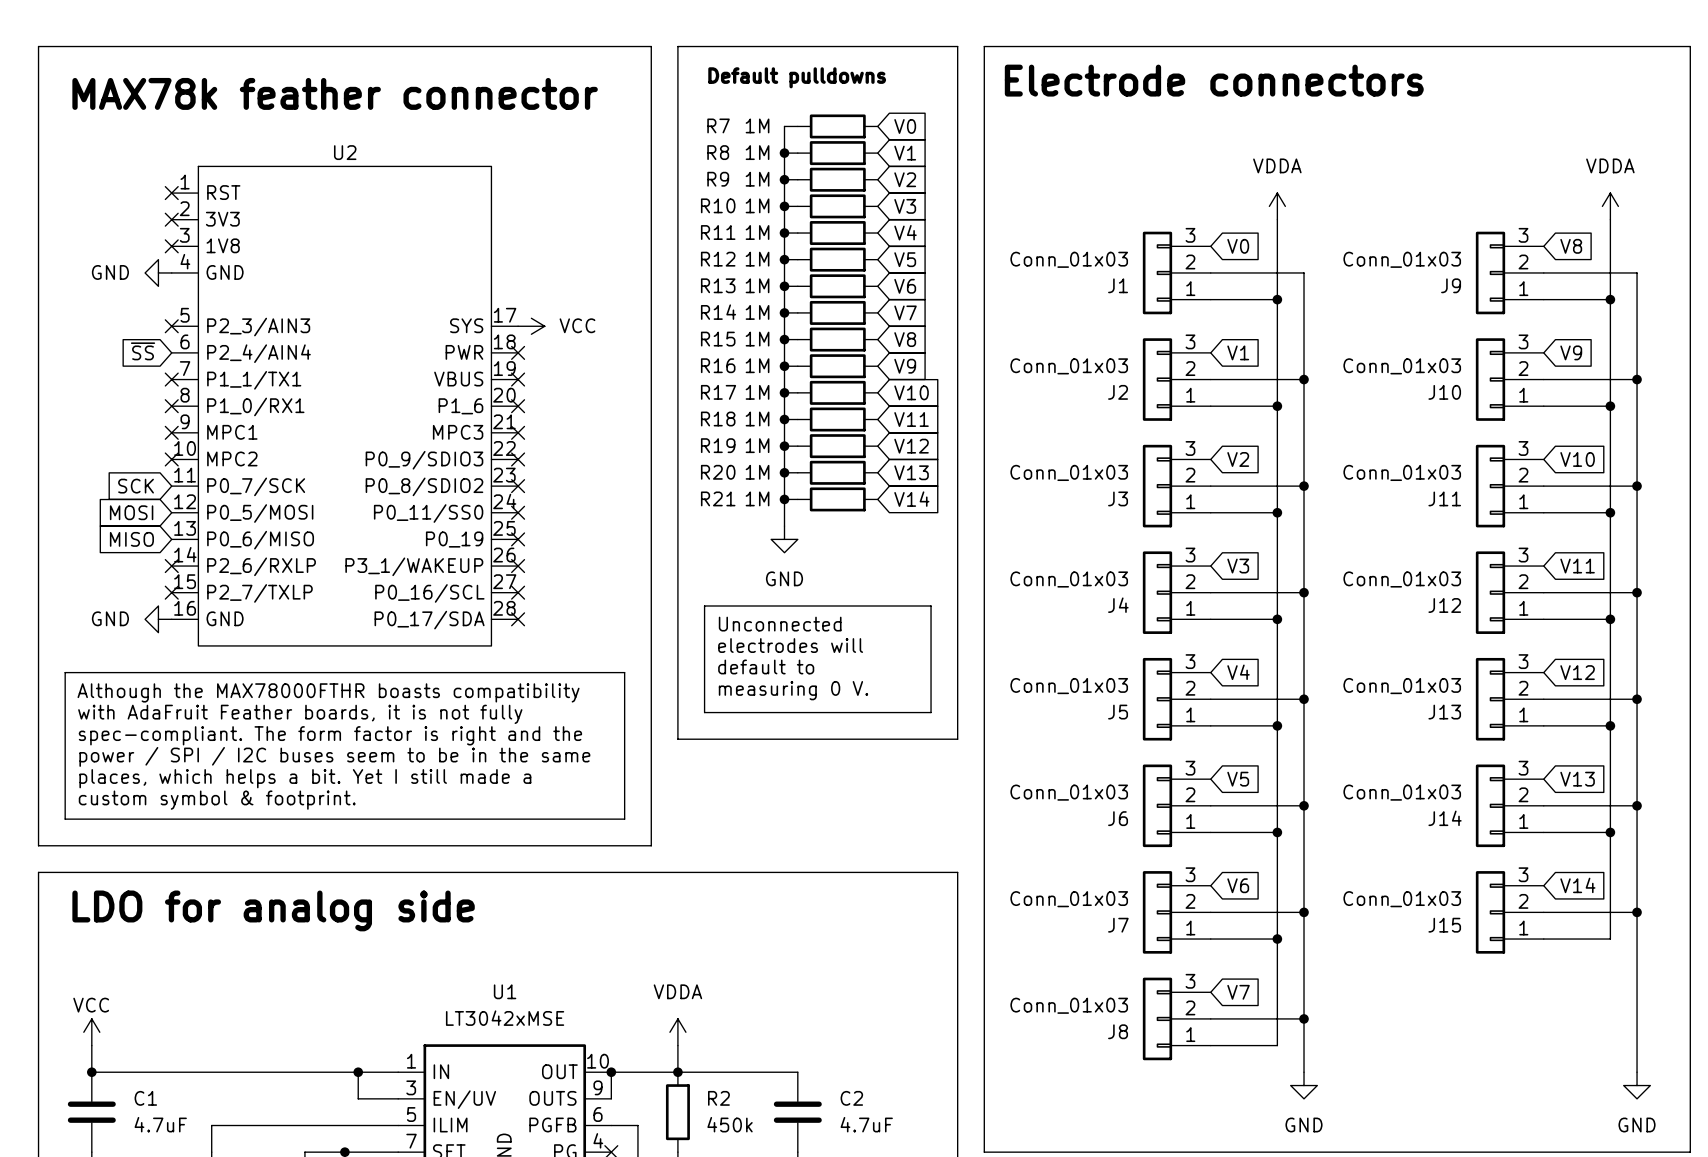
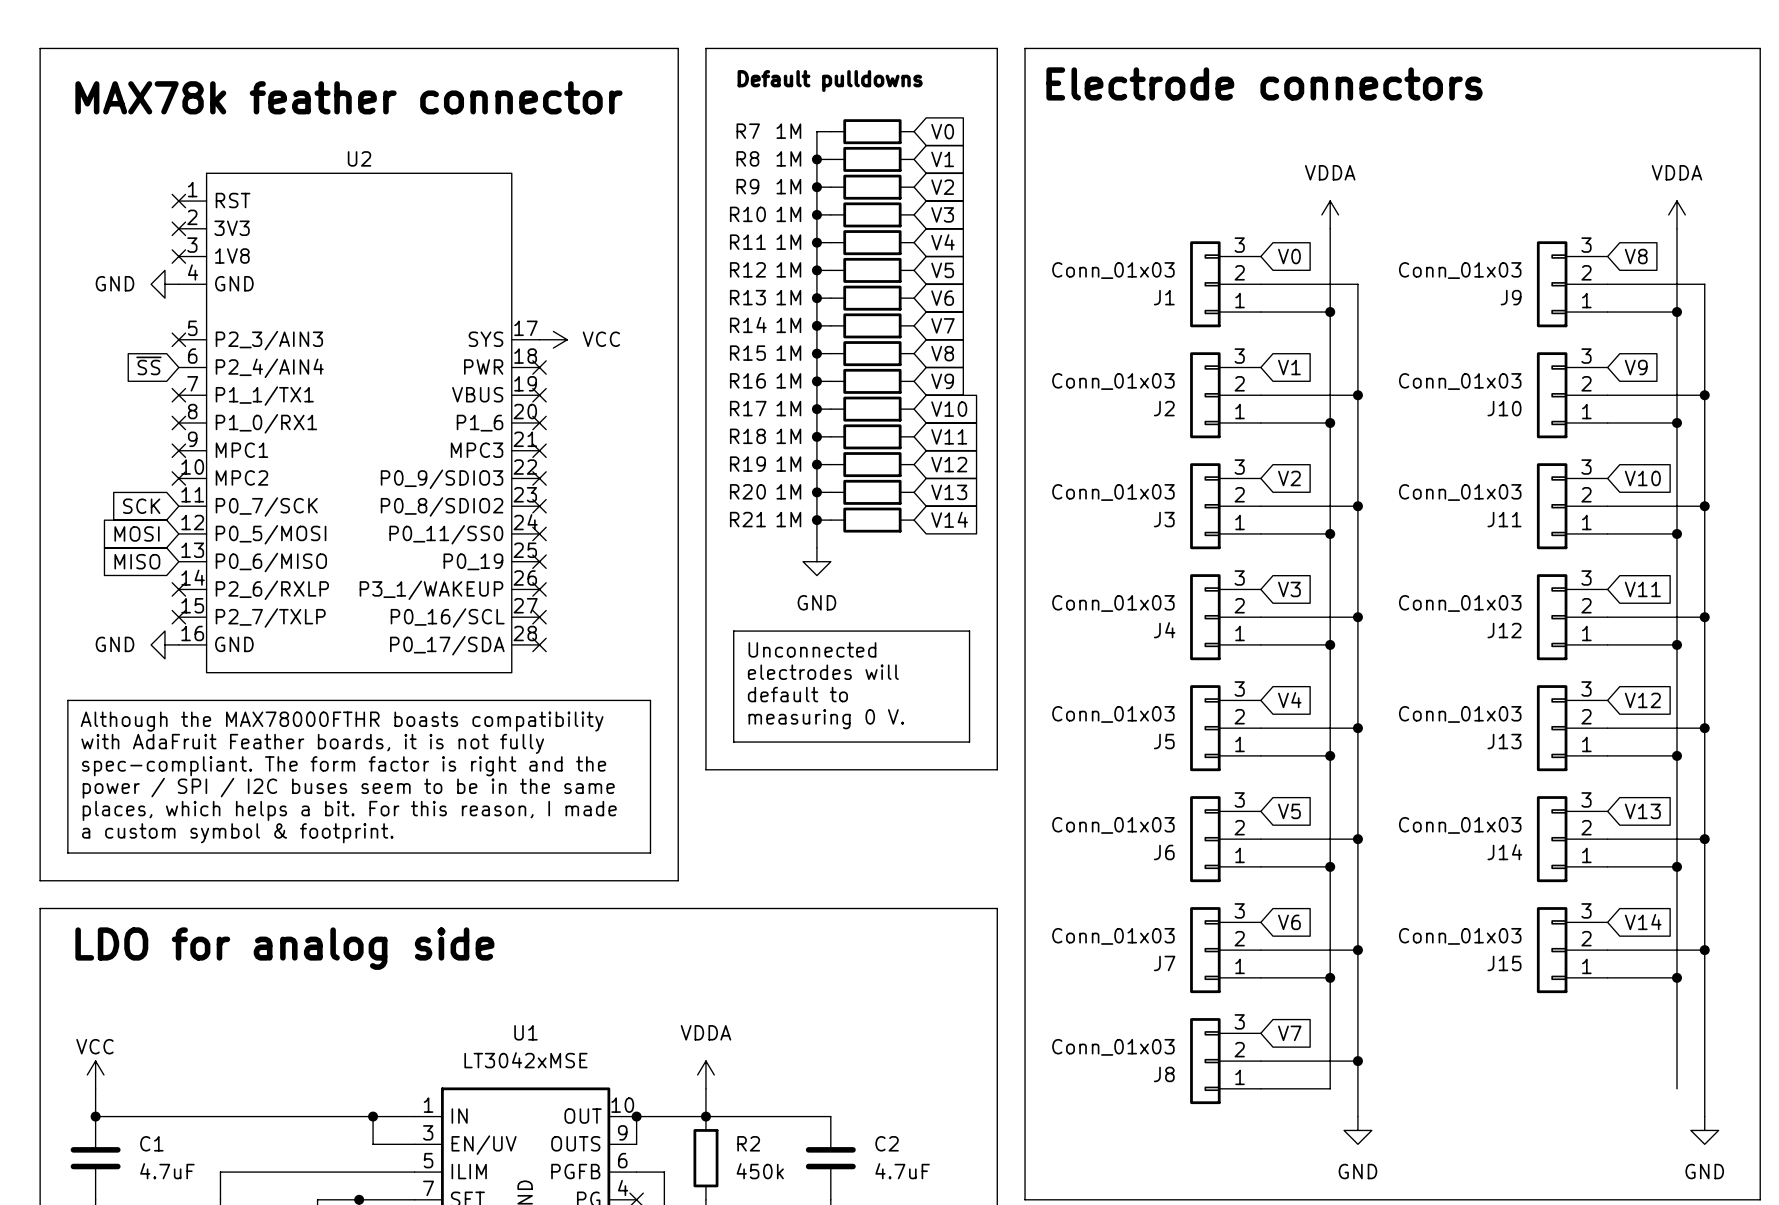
text: places, which helps a bit. Yet I still made a (305, 778) -> places, which helps a bit. For this reason, I made (349, 810)
text: custom symbol & footprint. (217, 800) -> a custom symbol & footprint. (237, 833)
wire: none -> (1676, 977) (1676, 1088)
junction: none -> (1676, 977)

